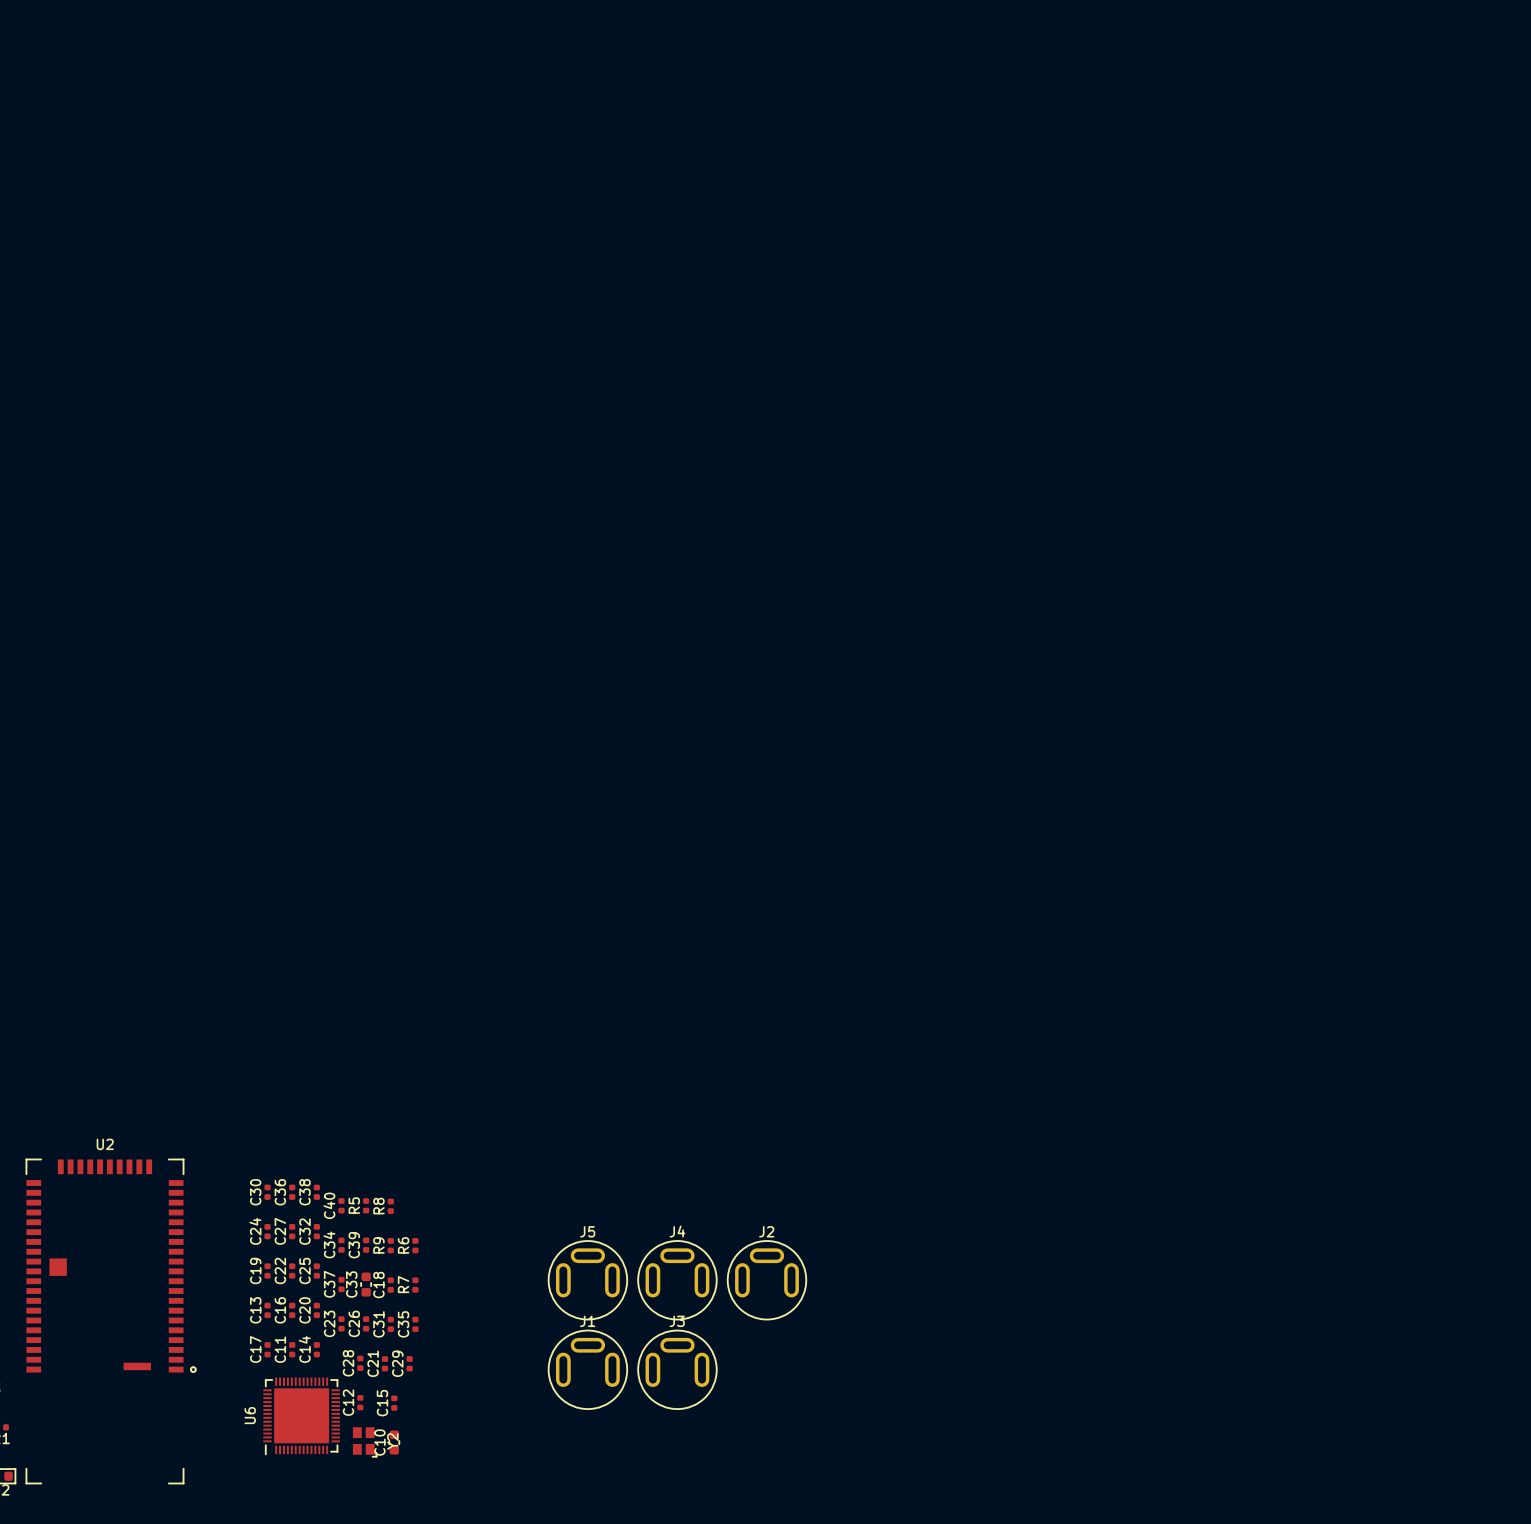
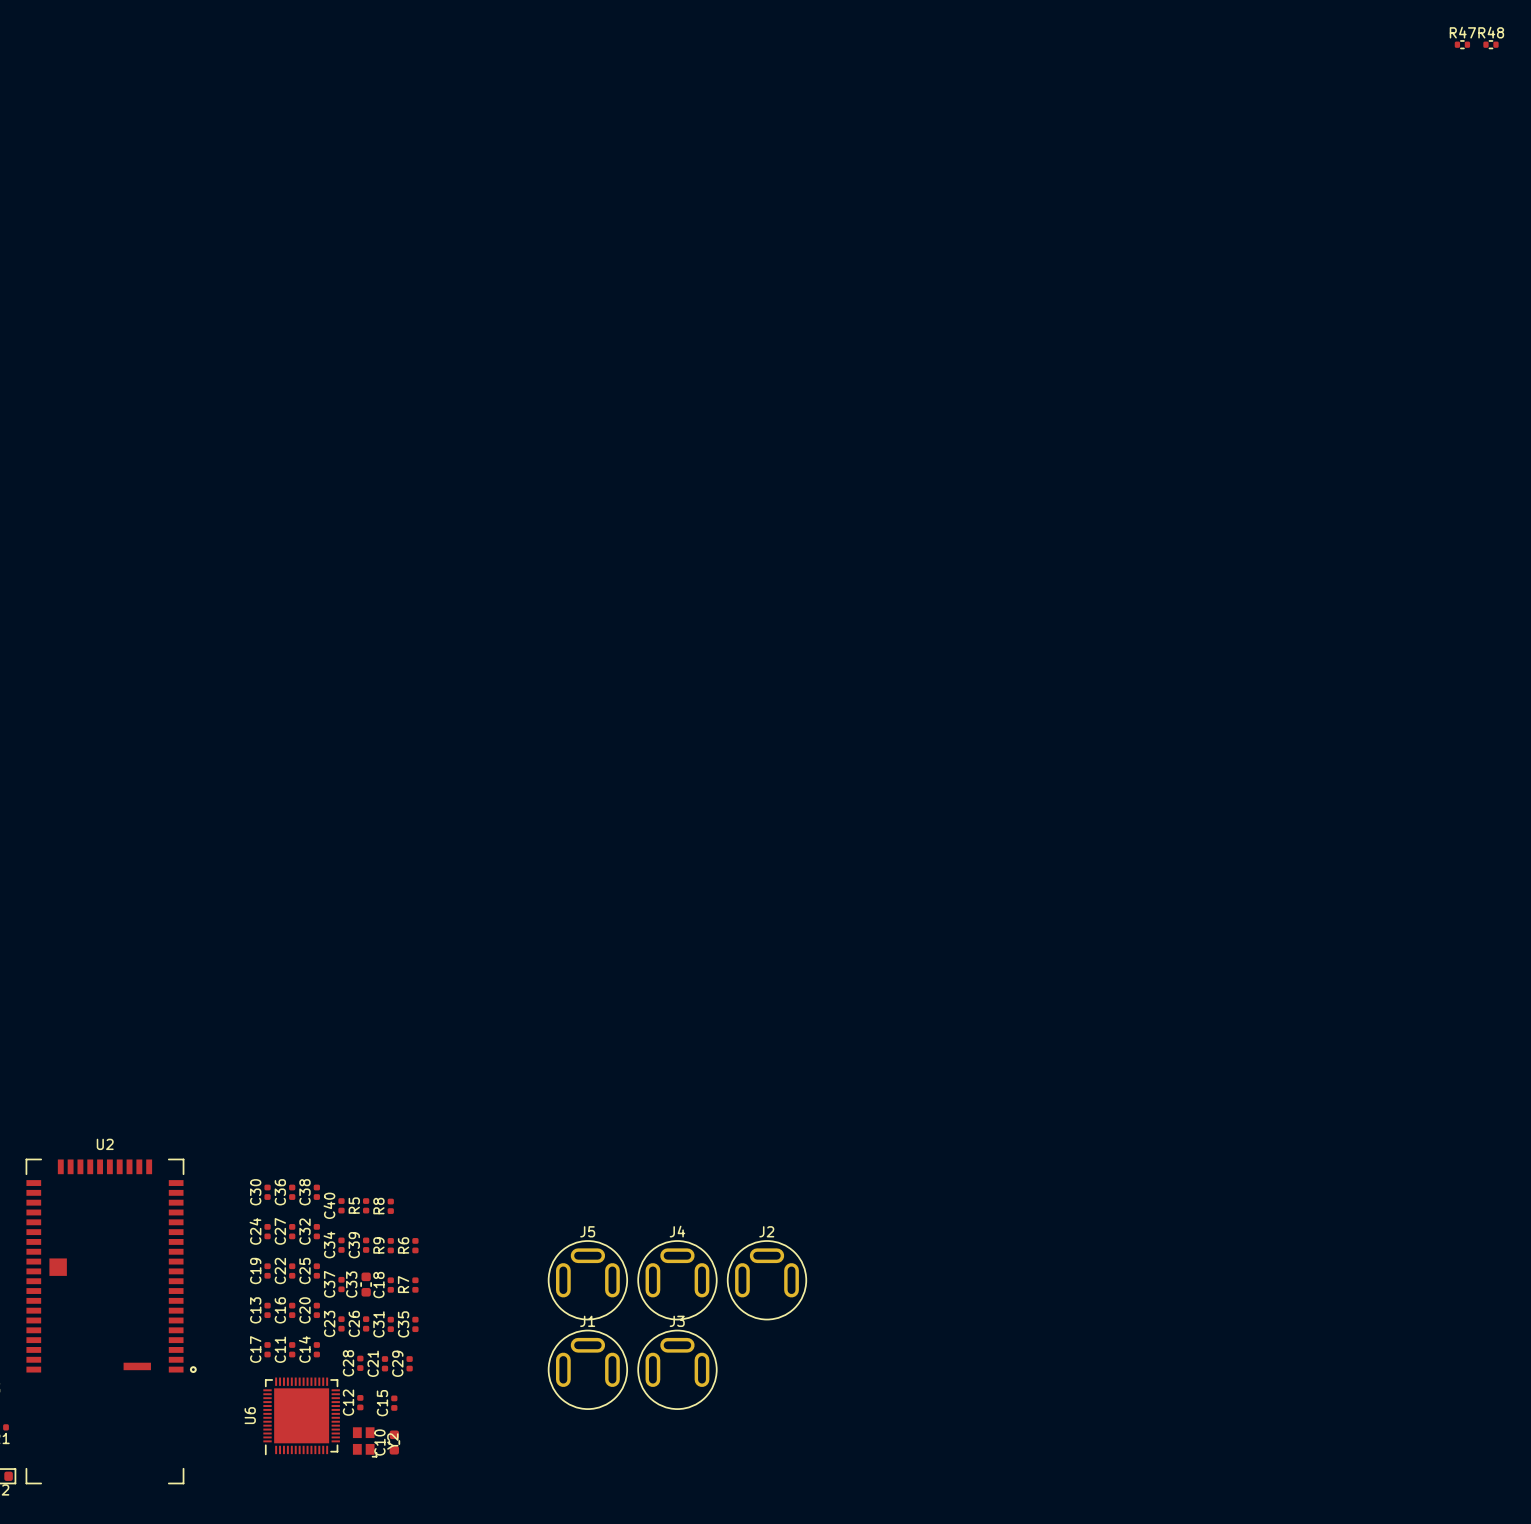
R47: none -> (1462, 44)
R48: none -> (1490, 44)

